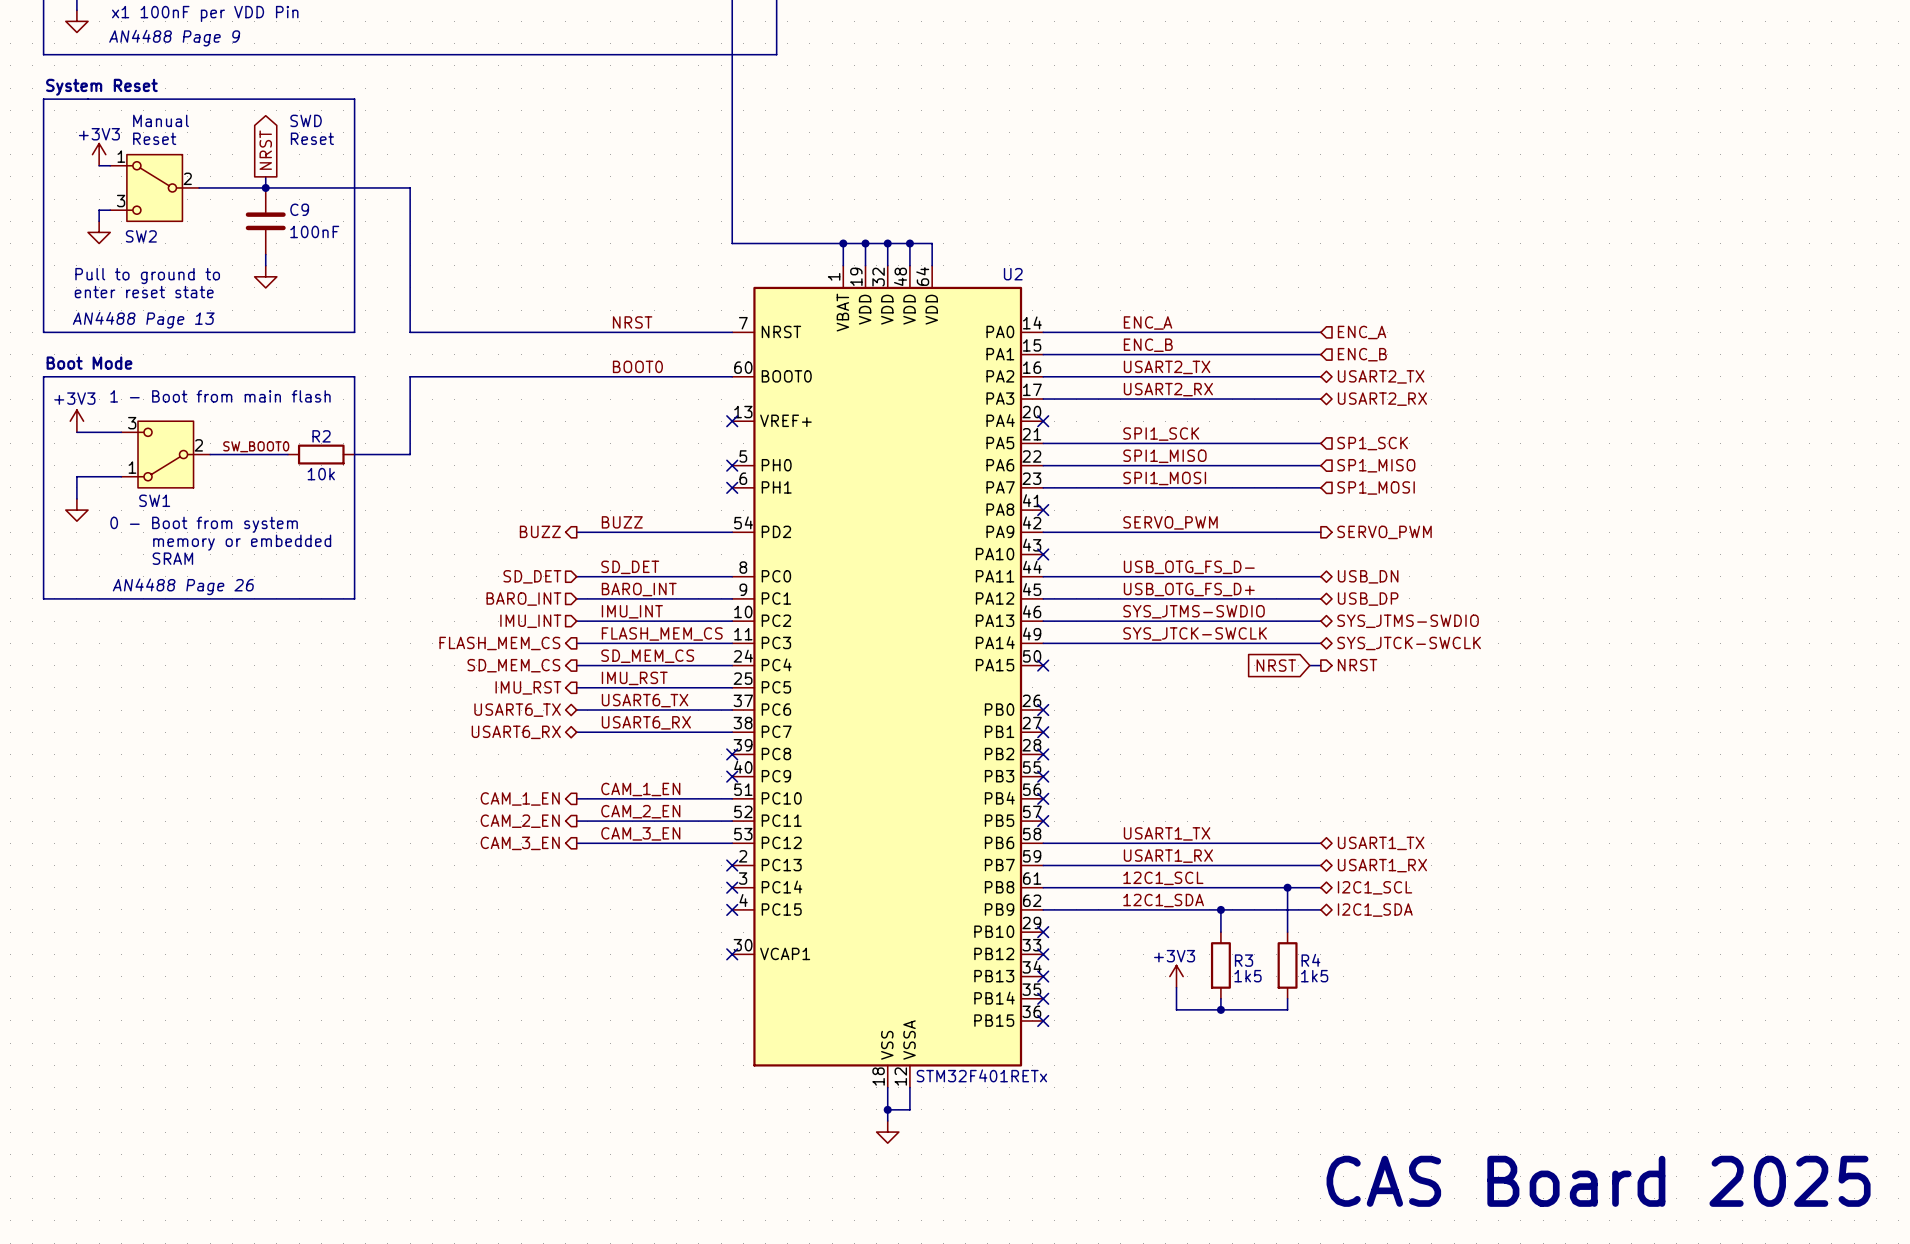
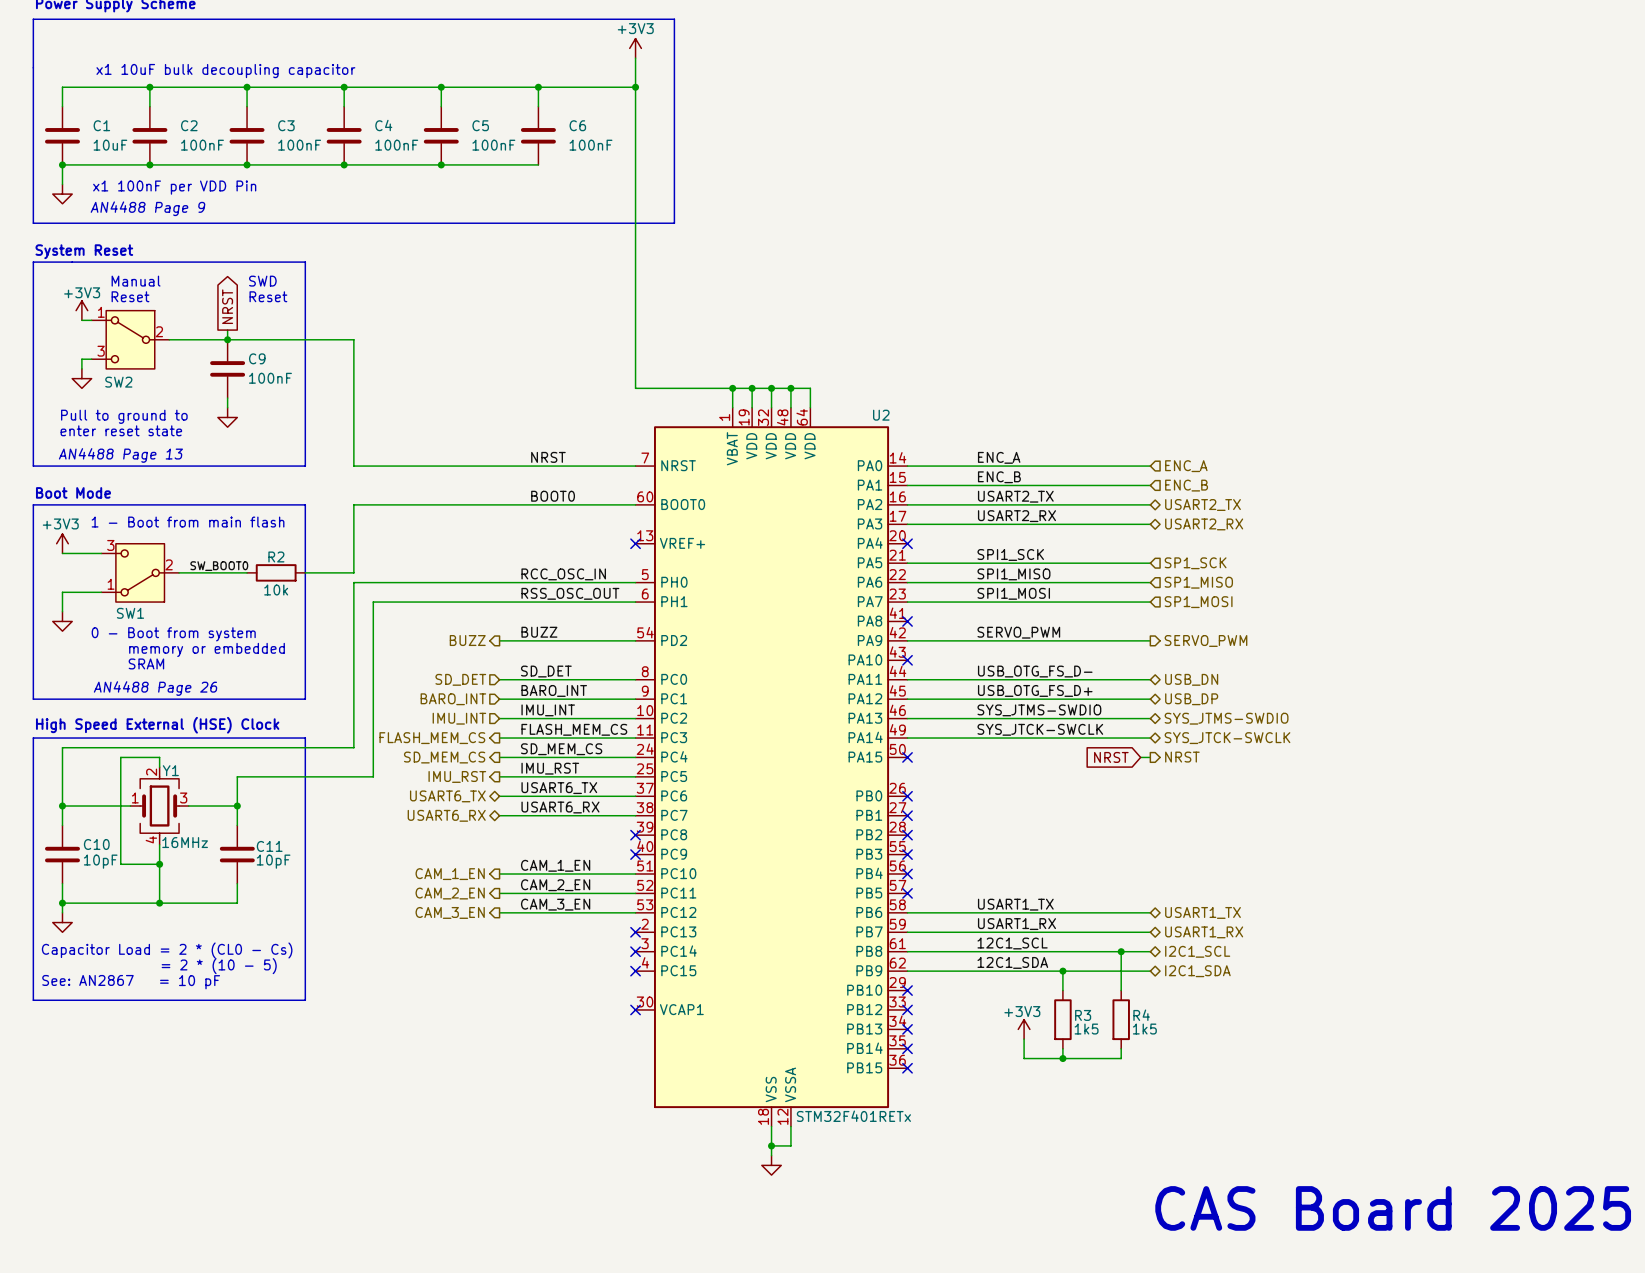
label: none -> RCC_OSC_IN (563, 574)
wire: none -> (635, 582) (353, 582) (353, 747) (62, 747) (62, 825)
no-connect mark: (732, 465) -> none
label: none -> RSS_OSC_OUT (570, 593)
wire: none -> (635, 602) (373, 602) (373, 776) (237, 776) (237, 825)
no-connect mark: (732, 487) -> none
text: none -> High Speed External (HSE) Clock (157, 725)
line: none -> (33, 738) (33, 1000) (305, 1000) (305, 738) (33, 738)
wire: none -> (159, 767) (159, 757) (120, 757) (120, 864) (159, 864)
wire: none -> (62, 806) (130, 806)
junction: none -> (62, 806)
Y1: none -> 16MHz (159, 806)
wire: none -> (188, 806) (237, 806)
junction: none -> (237, 806)
wire: none -> (159, 844) (159, 903)
C10: none -> 10pF (62, 854)
C11: none -> 10pF (237, 854)
junction: none -> (159, 864)
wire: none -> (62, 883) (62, 912)
wire: none -> (237, 883) (237, 903) (62, 903)
junction: none -> (62, 903)
junction: none -> (159, 903)
power symbol: none -> (62, 922)
text: none -> Capacitor Load = 2 * (CL0 - Cs) (167, 950)
text: none -> = 2 * (10 - 5) (219, 966)
text: none -> See: AN2867 (87, 980)
text: none -> = 10 pF (190, 982)

